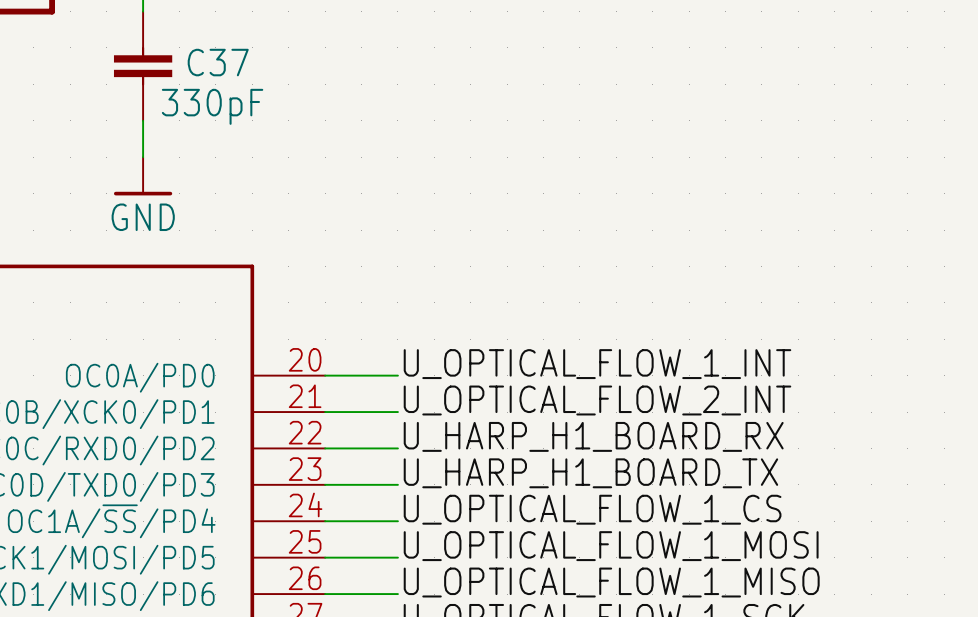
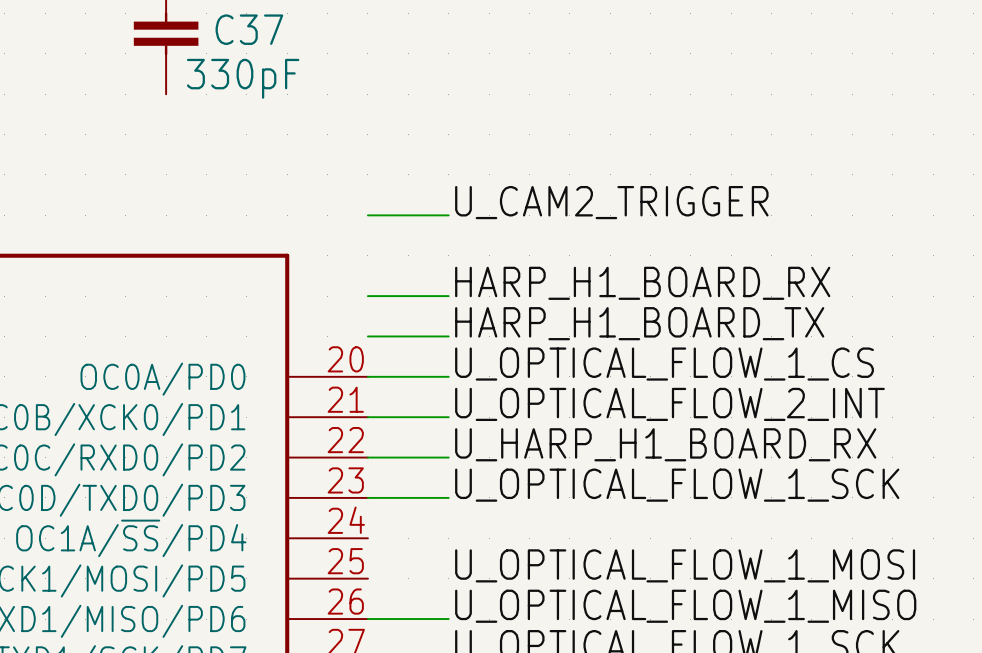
wire: (143, 120) (143, 157) -> none
power symbol: GND (143, 176) -> none
label: none -> U_CAM2_TRIGGER (611, 202)
wire: none -> (367, 215) (448, 215)
label: none -> HARP_H1_BOARD_RX (642, 283)
label: none -> HARP_H1_BOARD_TX (639, 323)
label: U_OPTICAL_FLOW_1_INT (597, 364) -> U_OPTICAL_FLOW_1_CS (664, 364)
label: U_HARP_H1_BOARD_TX (590, 473) -> U_OPTICAL_FLOW_1_SCK (677, 485)
label: U_OPTICAL_FLOW_1_CS (592, 509) -> none
wire: (325, 521) (397, 521) -> (367, 296) (448, 296)
wire: (325, 557) (397, 557) -> (367, 336) (448, 336)

